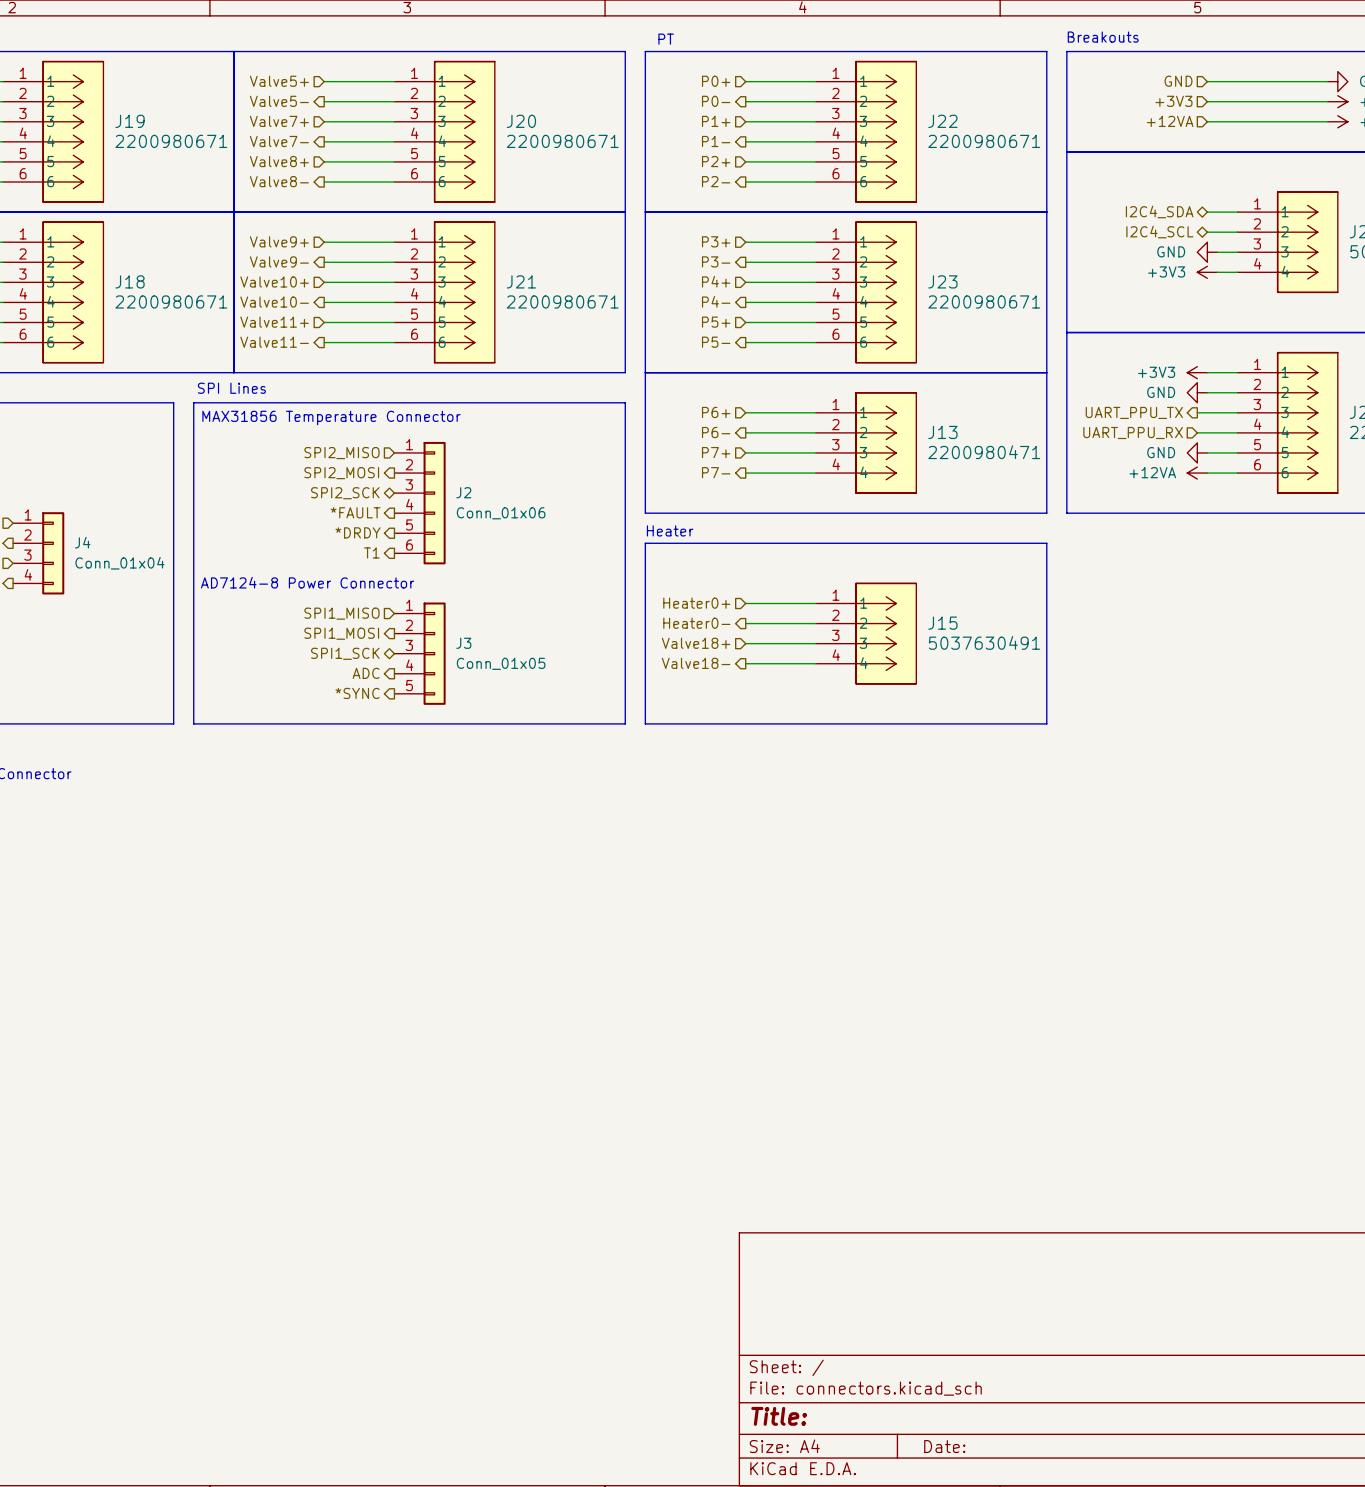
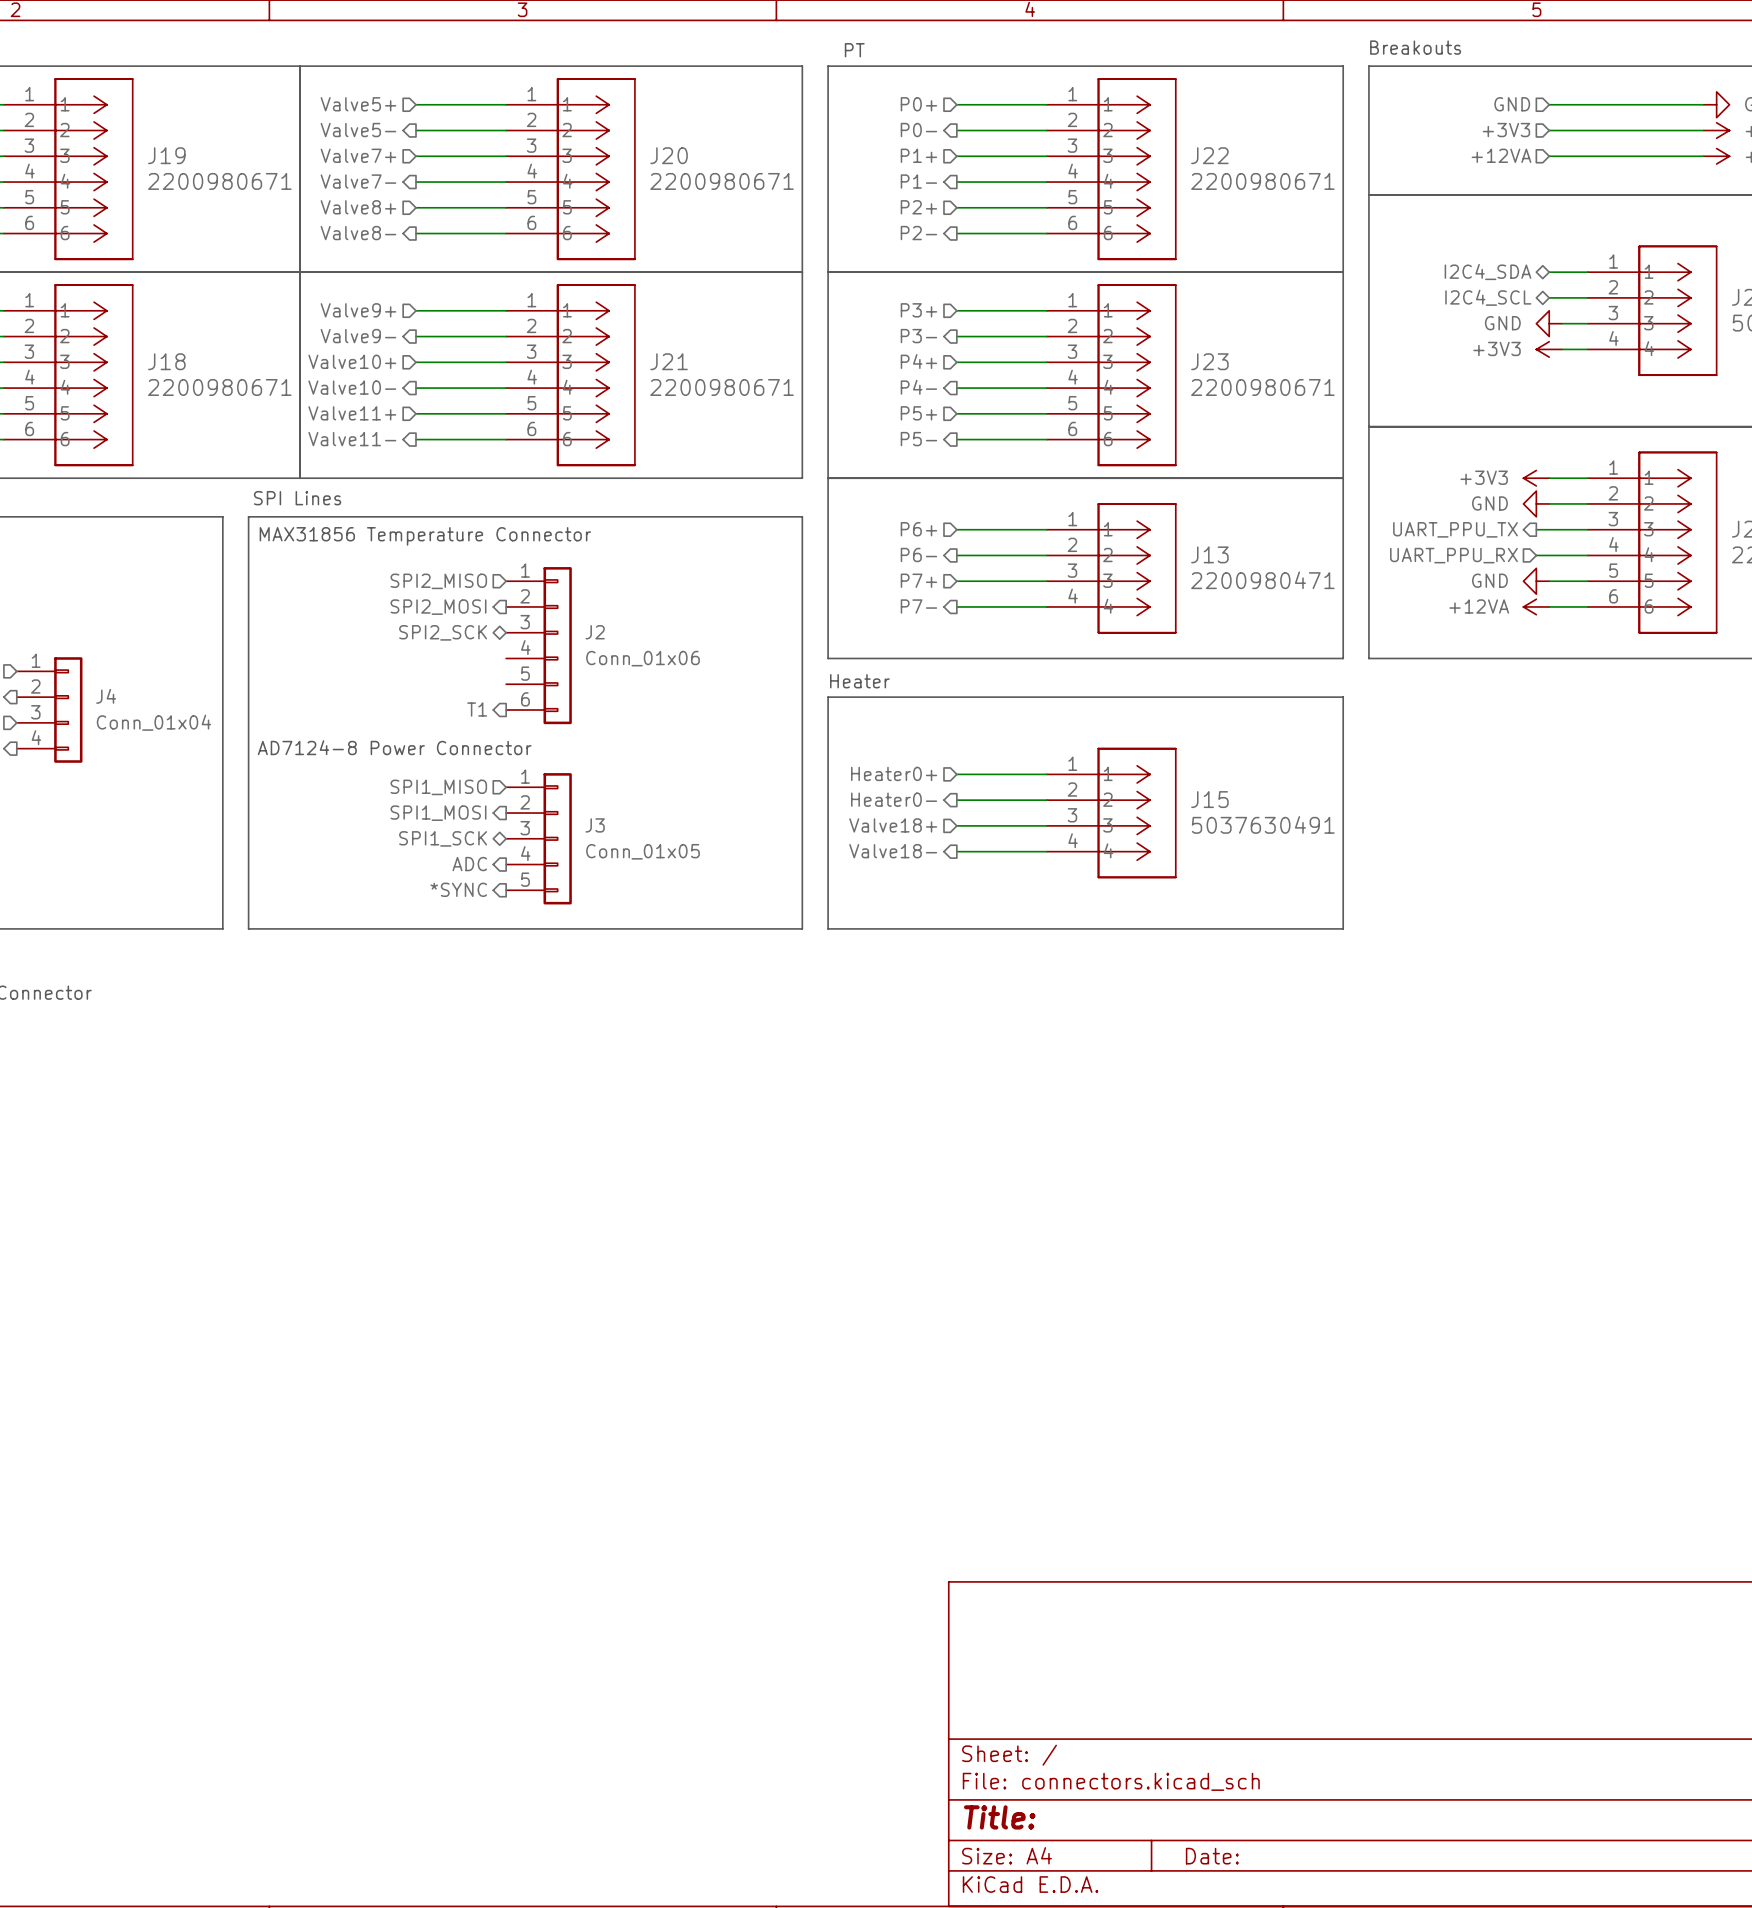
hierarchical label: *FAULT (355, 512) -> none
hierarchical label: *DRDY (357, 532) -> none

